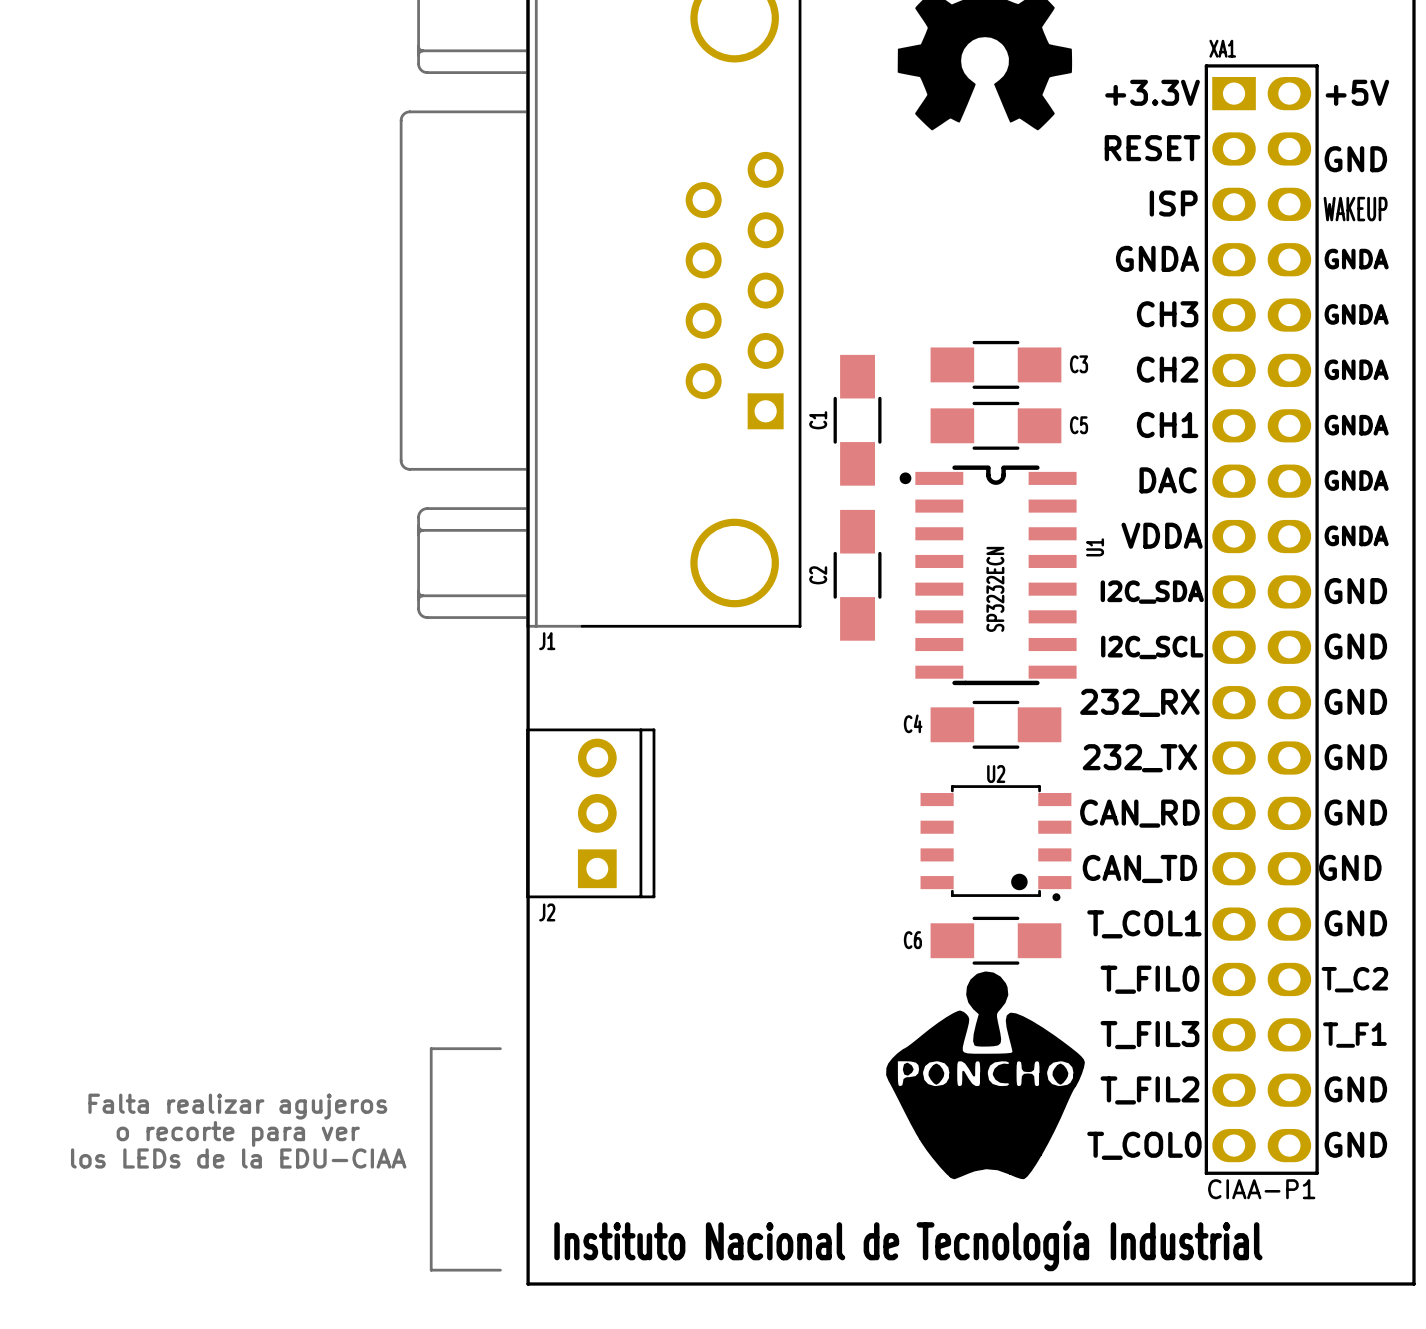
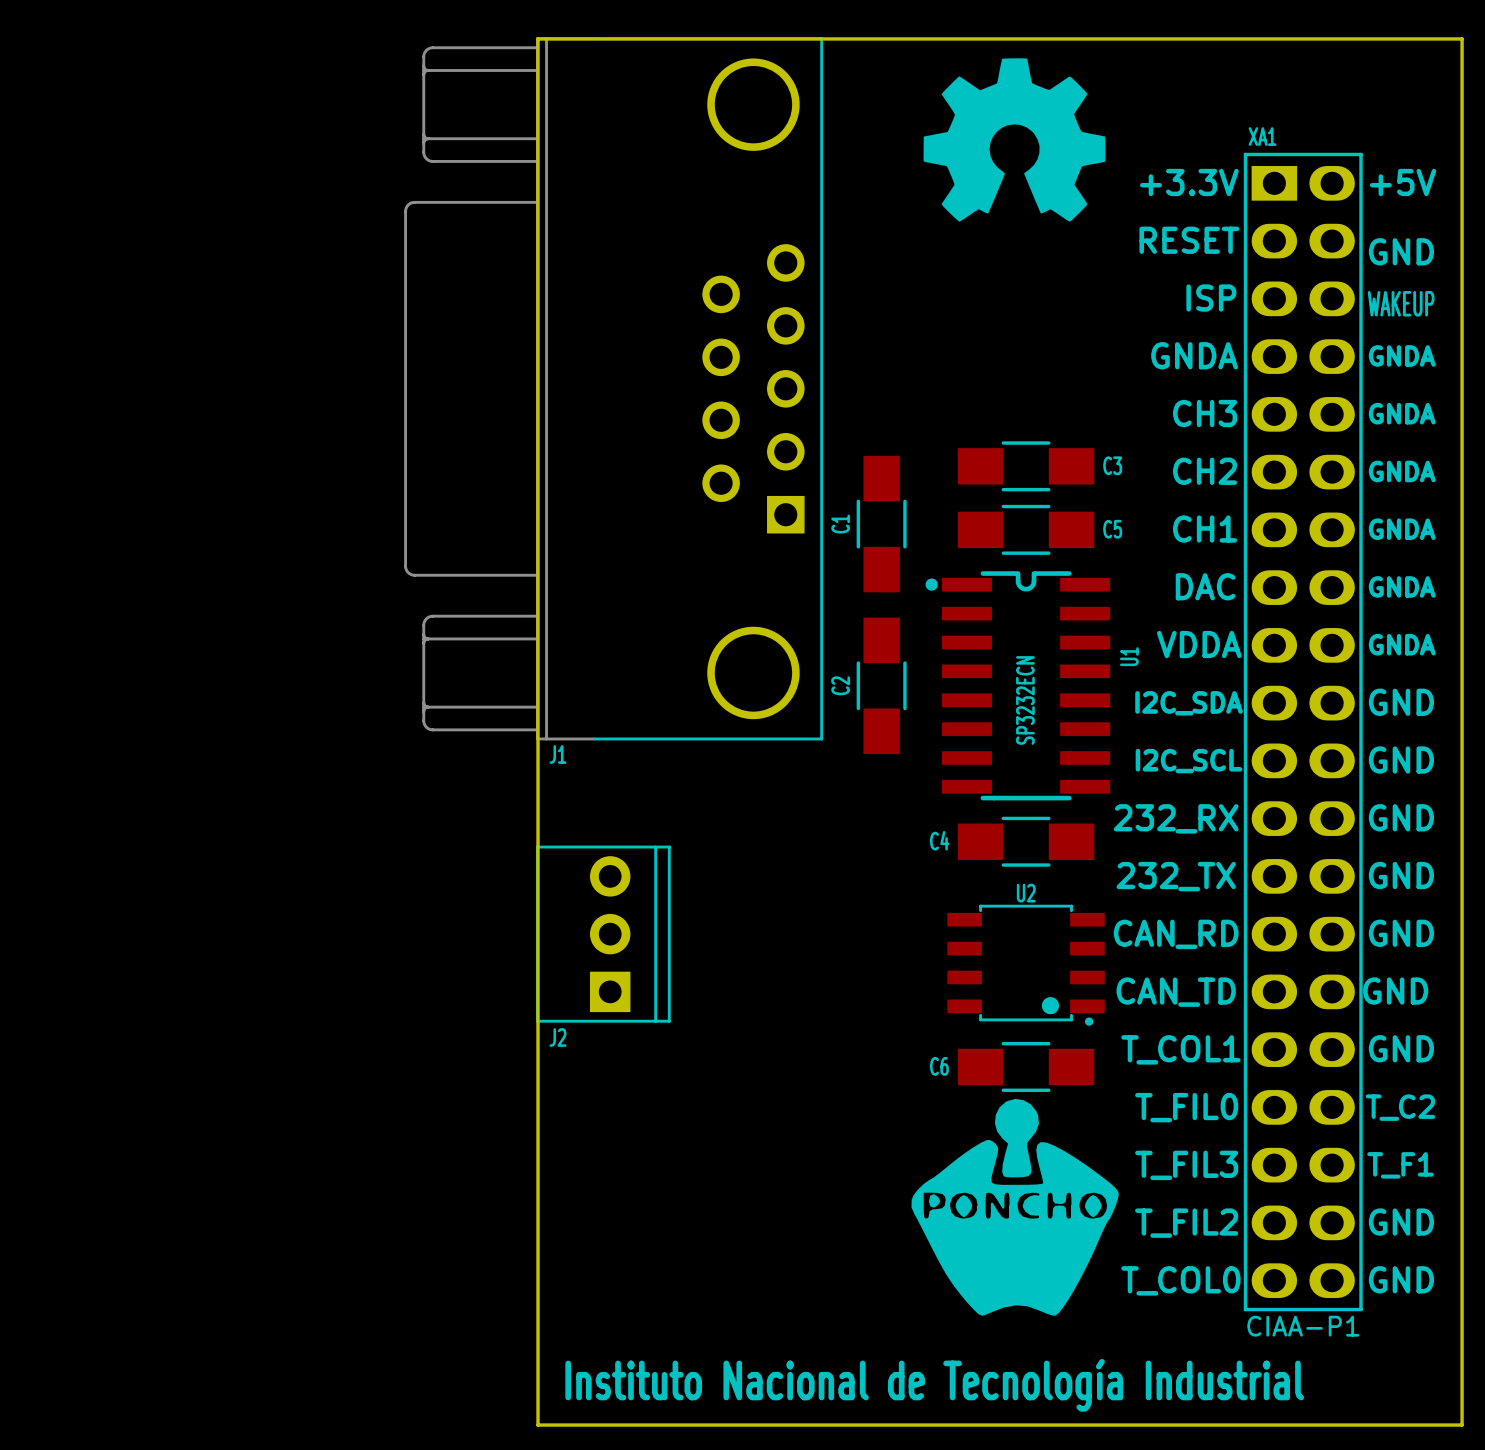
line: (500, 1048) (431, 1048) (431, 1270) (500, 1270) -> none
text: Falta realizar agujeros (237, 1106) -> none
text: o recorte para ver (238, 1133) -> none
text: los LEDs de la EDU-CIAA (238, 1158) -> none

